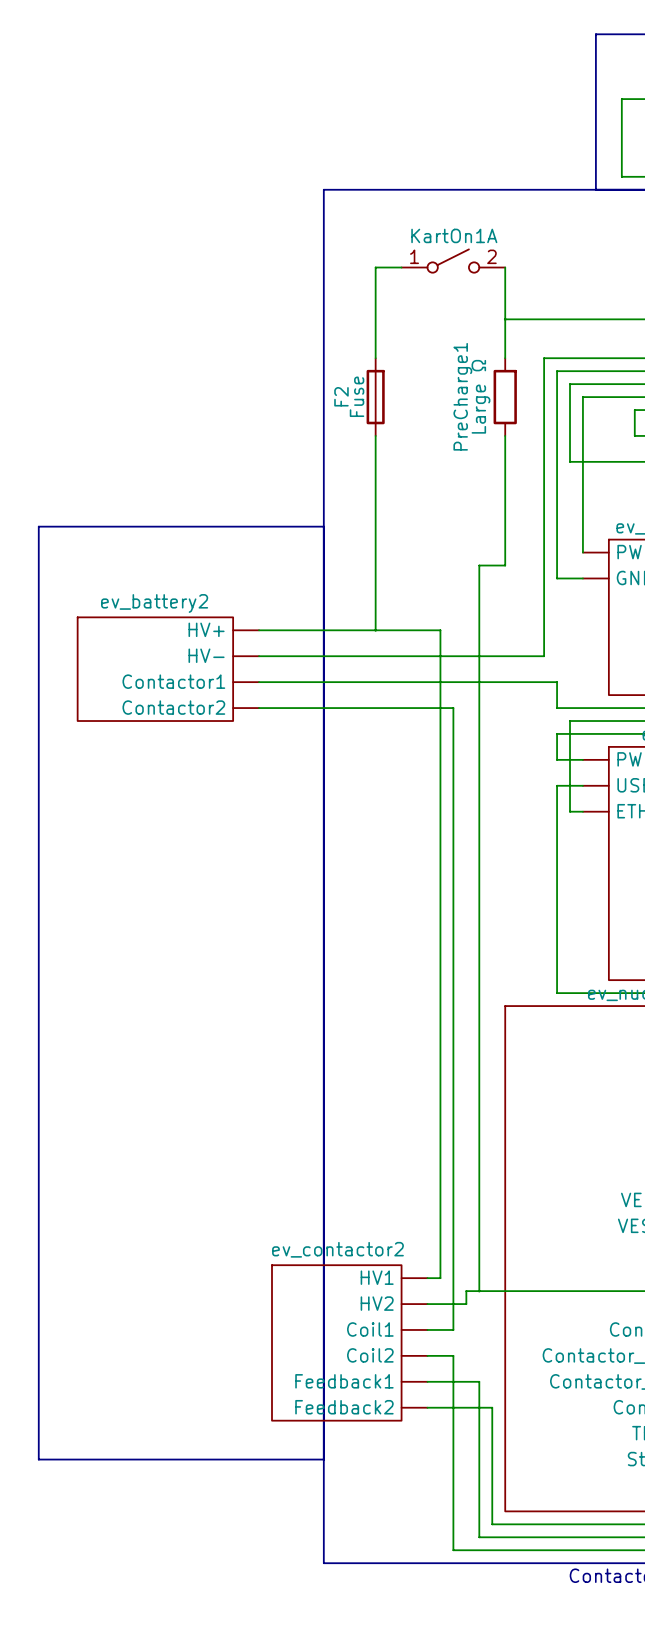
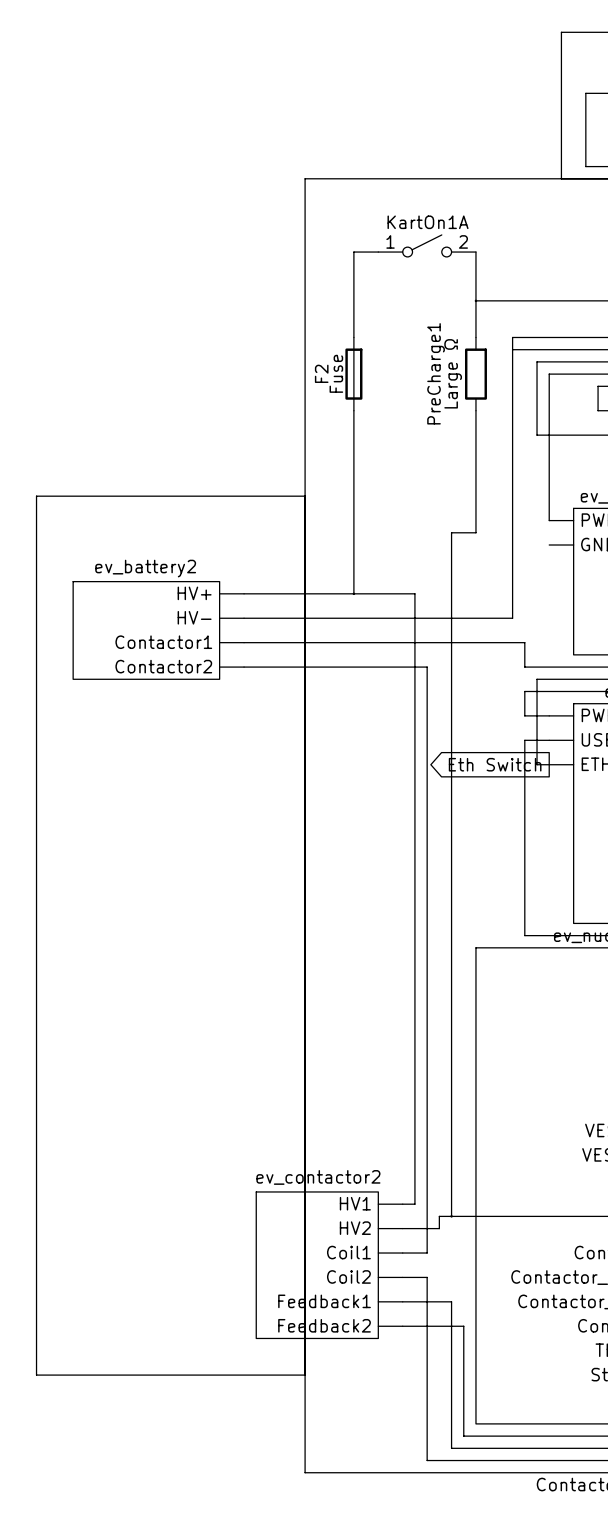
wire: (557, 371) (557, 578) (582, 578) -> (524, 349) (512, 349)
global label: none -> Eth Switch (495, 764)

